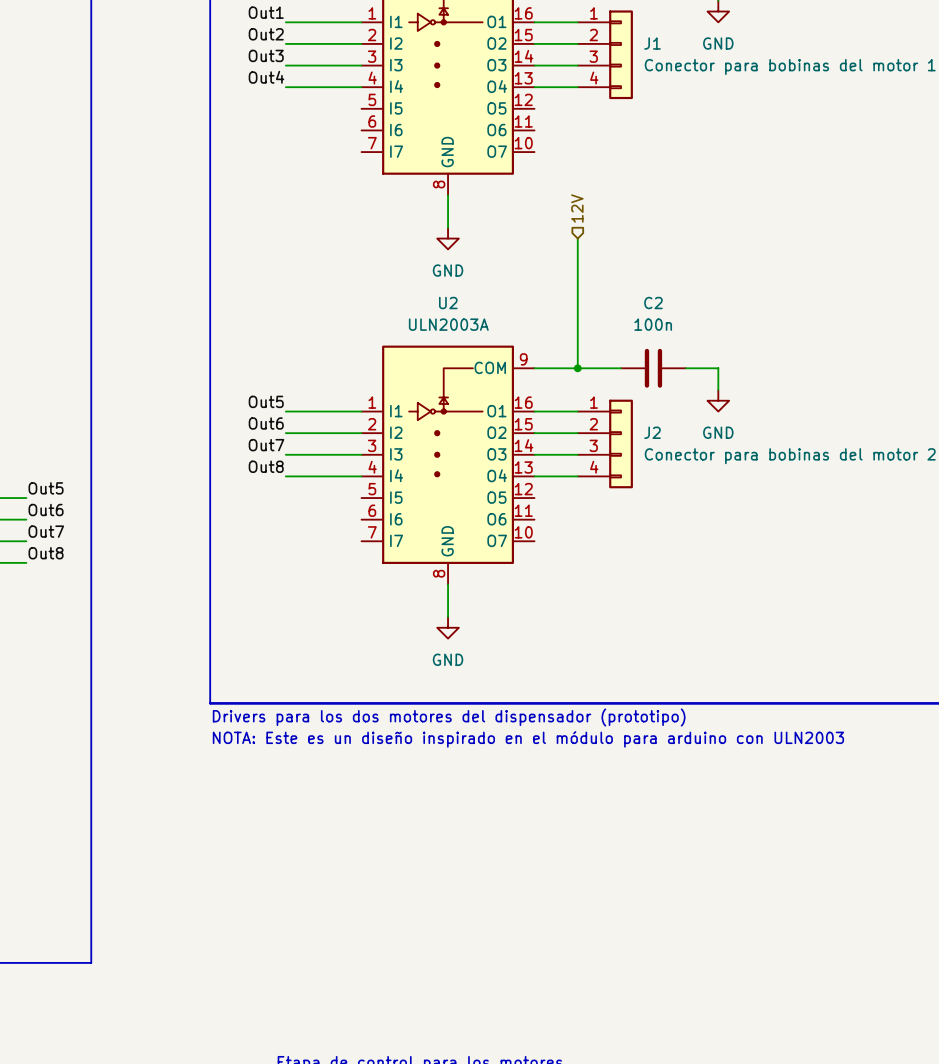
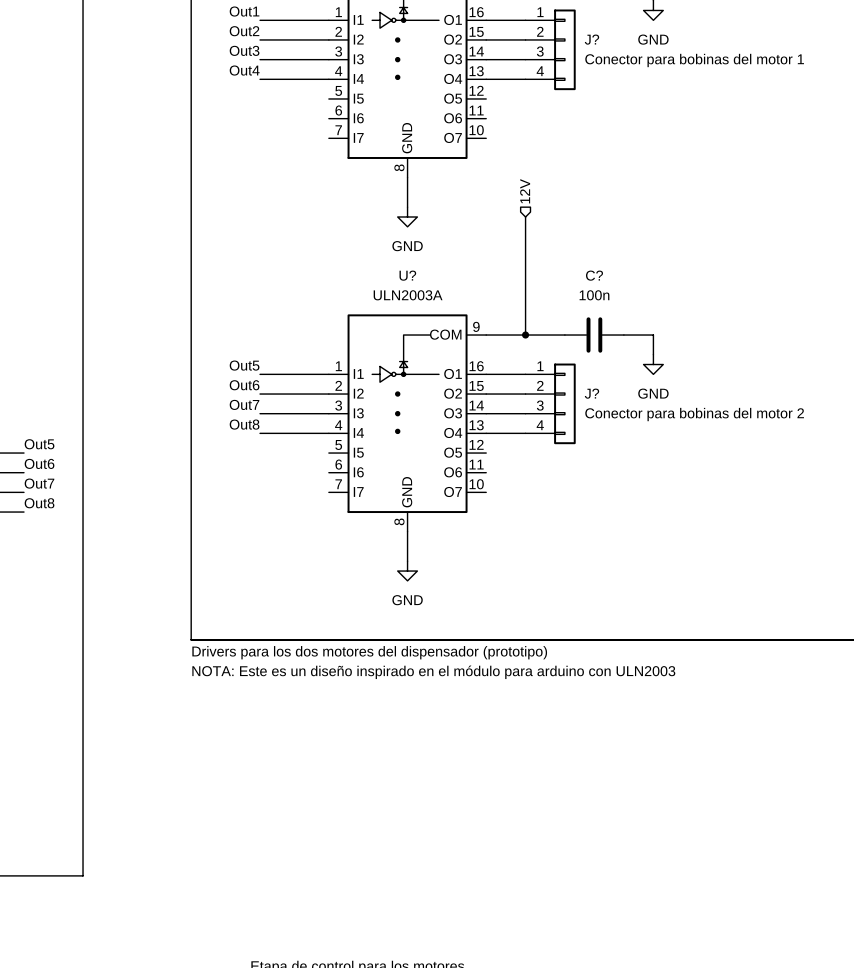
J1 name: J1 (652, 43) -> J? (591, 39)
U2 name: U2 (448, 303) -> U? (407, 275)
C2 name: C2 (653, 303) -> C? (594, 275)
J2 name: J2 (652, 432) -> J? (591, 393)

